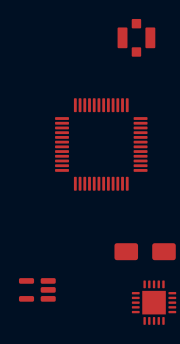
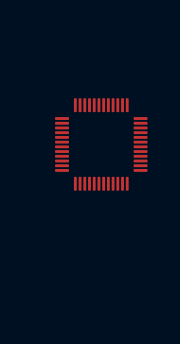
part: (136, 37) -> none
part: (145, 251) -> none
part: (37, 289) -> none
part: (154, 302) -> none

